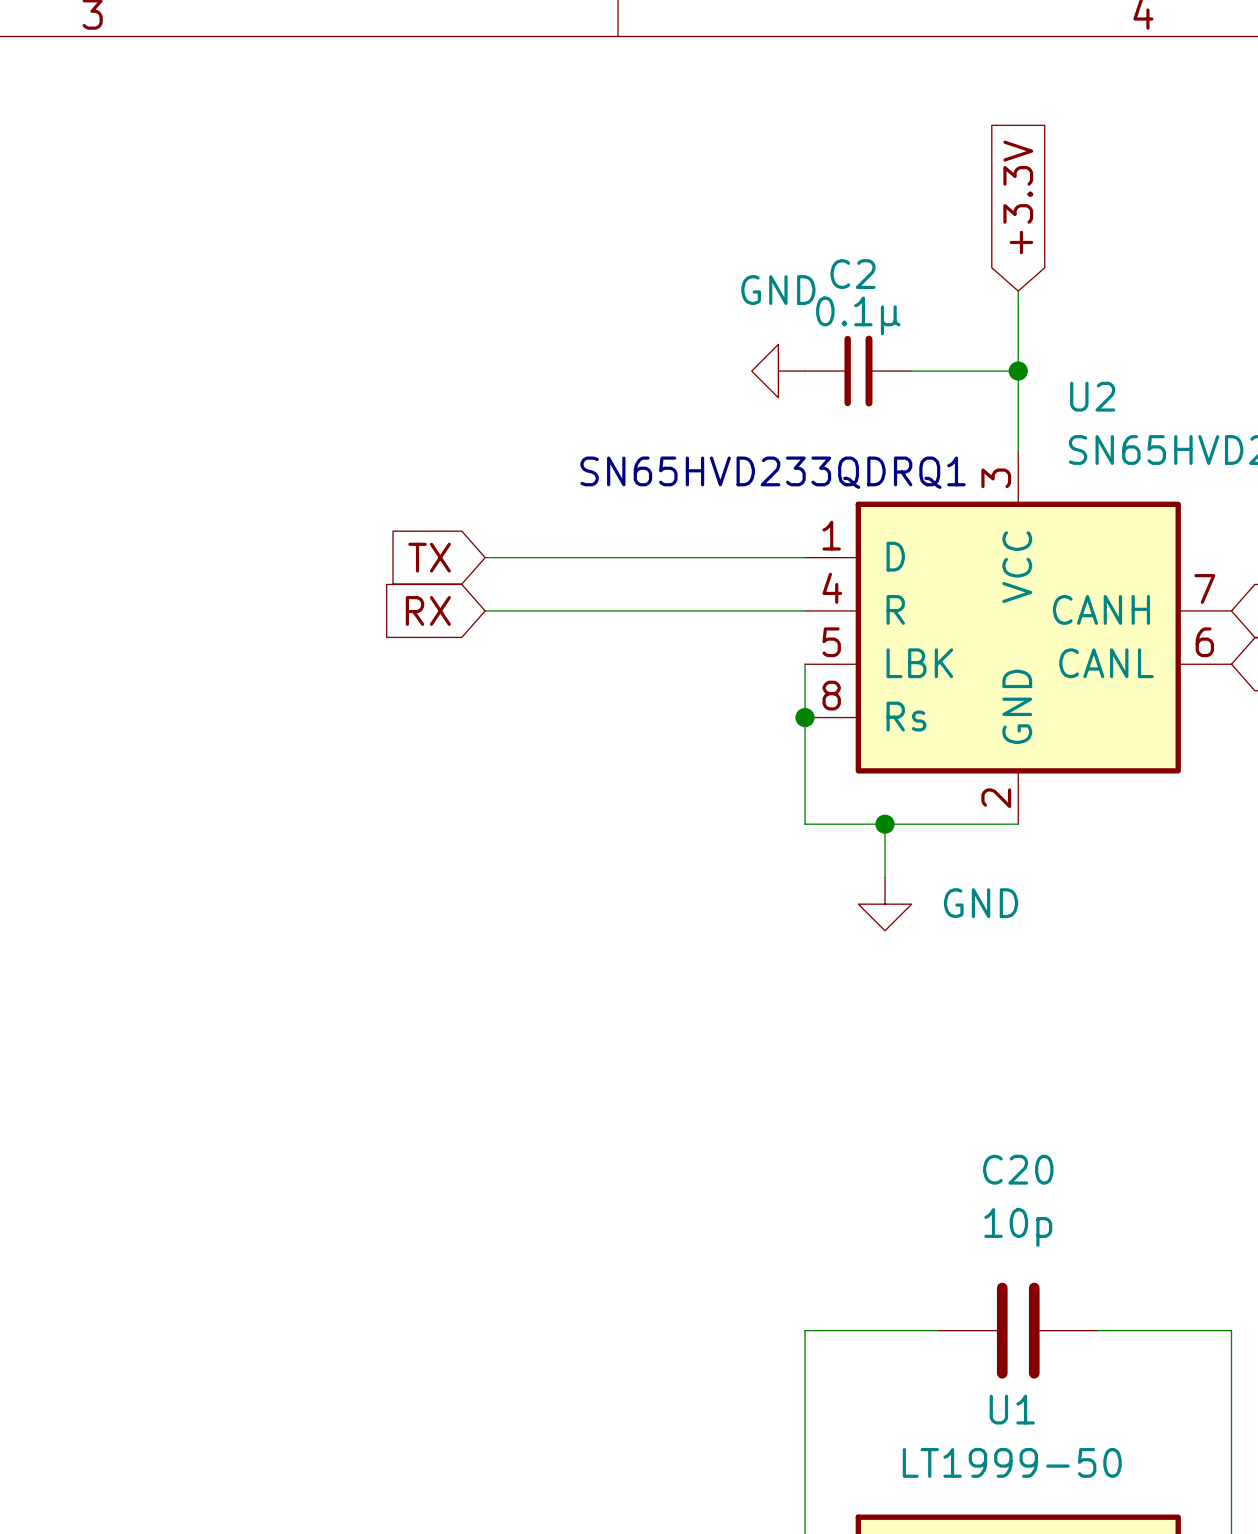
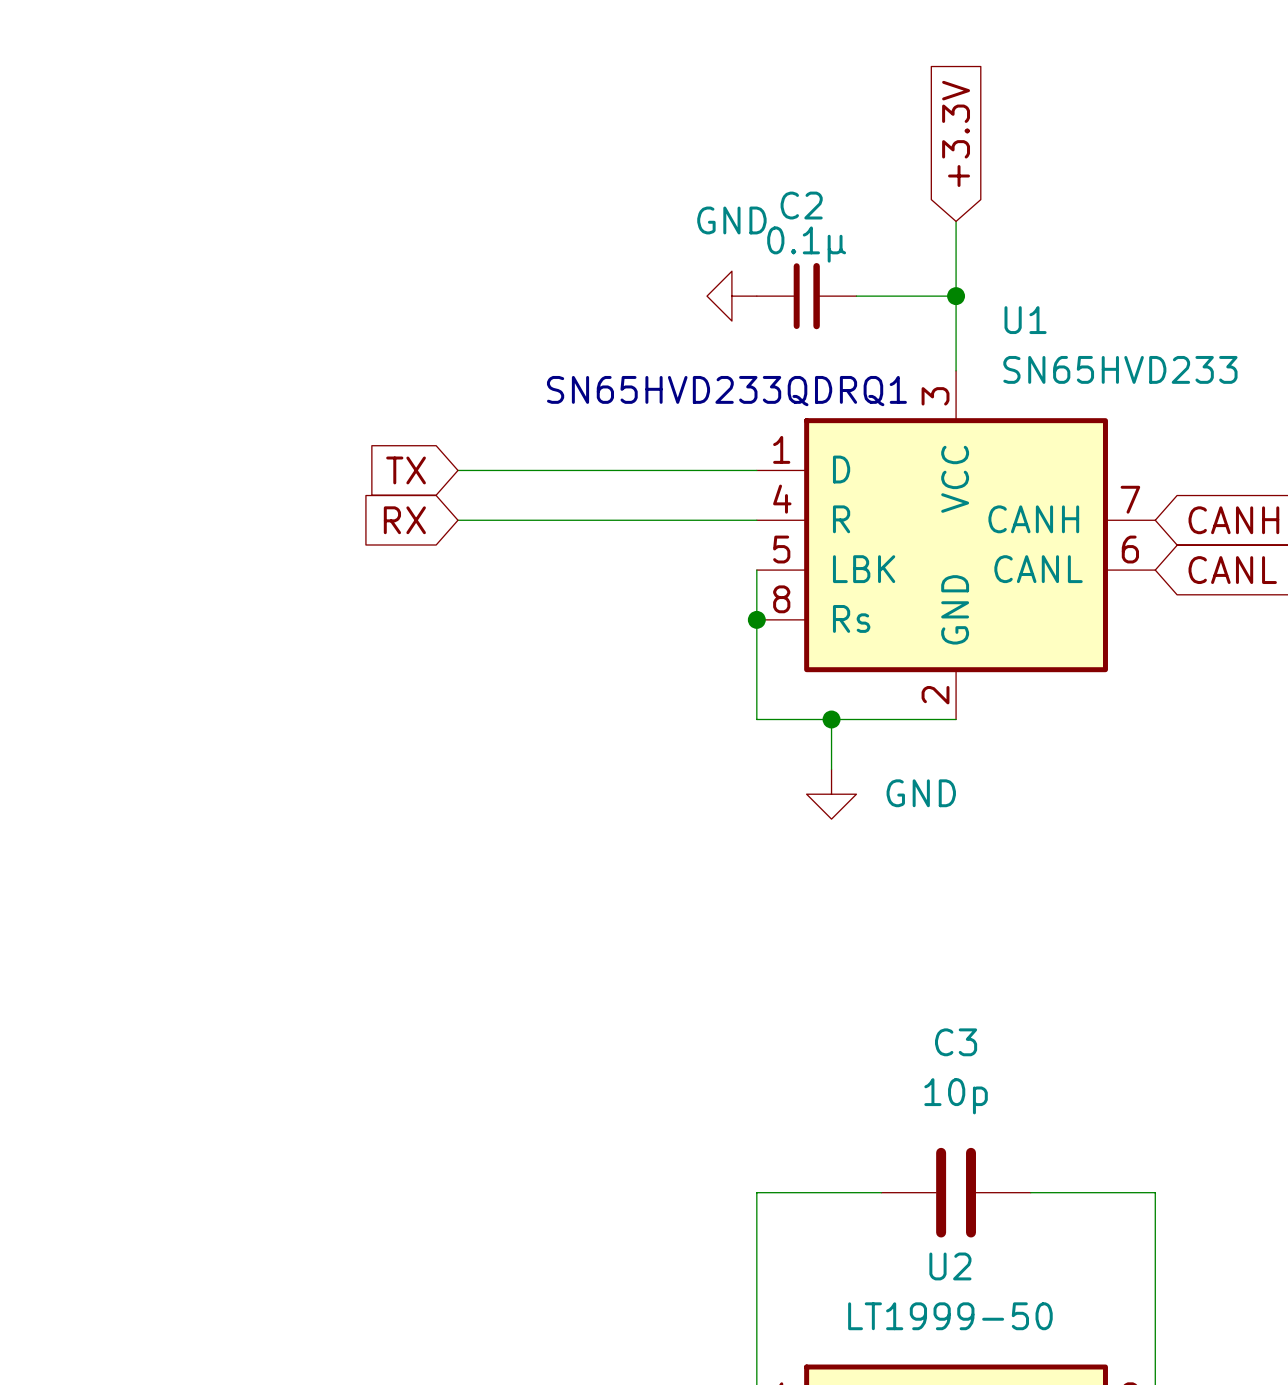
U2 name: U2 (1092, 396) -> U1 (1025, 320)
C20 name: C20 (1018, 1169) -> C3 (956, 1042)
U1 name: U1 (1012, 1409) -> U2 (950, 1266)

